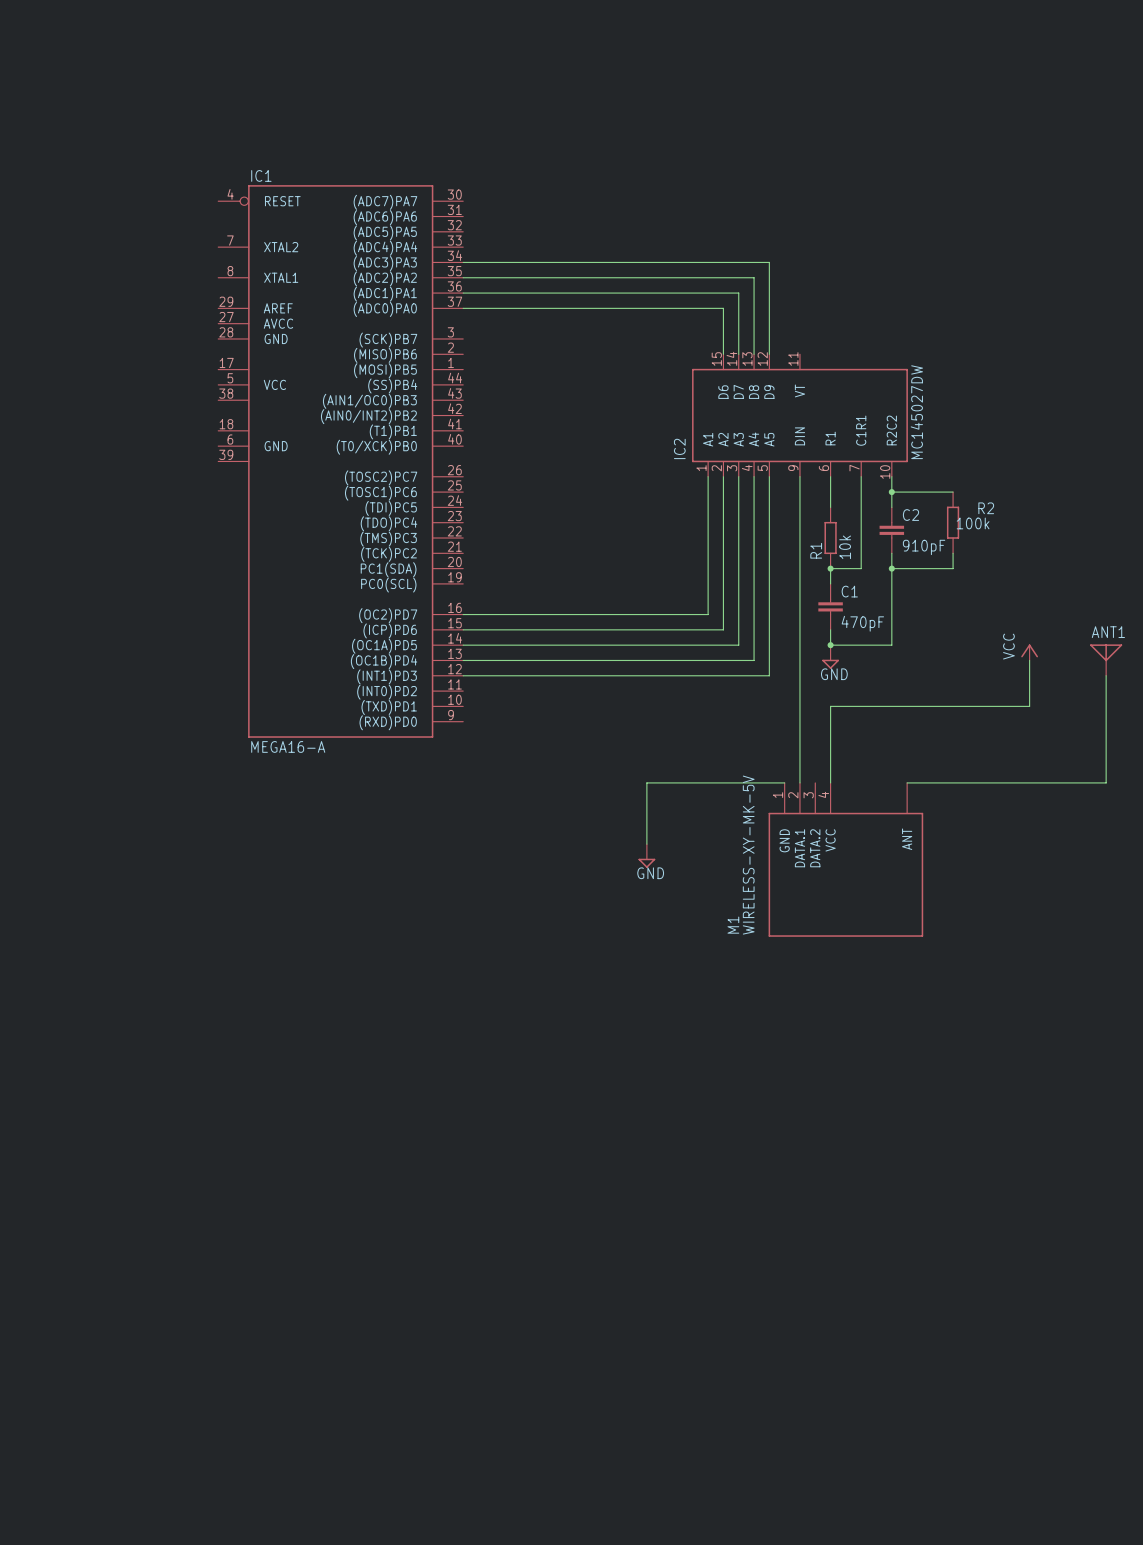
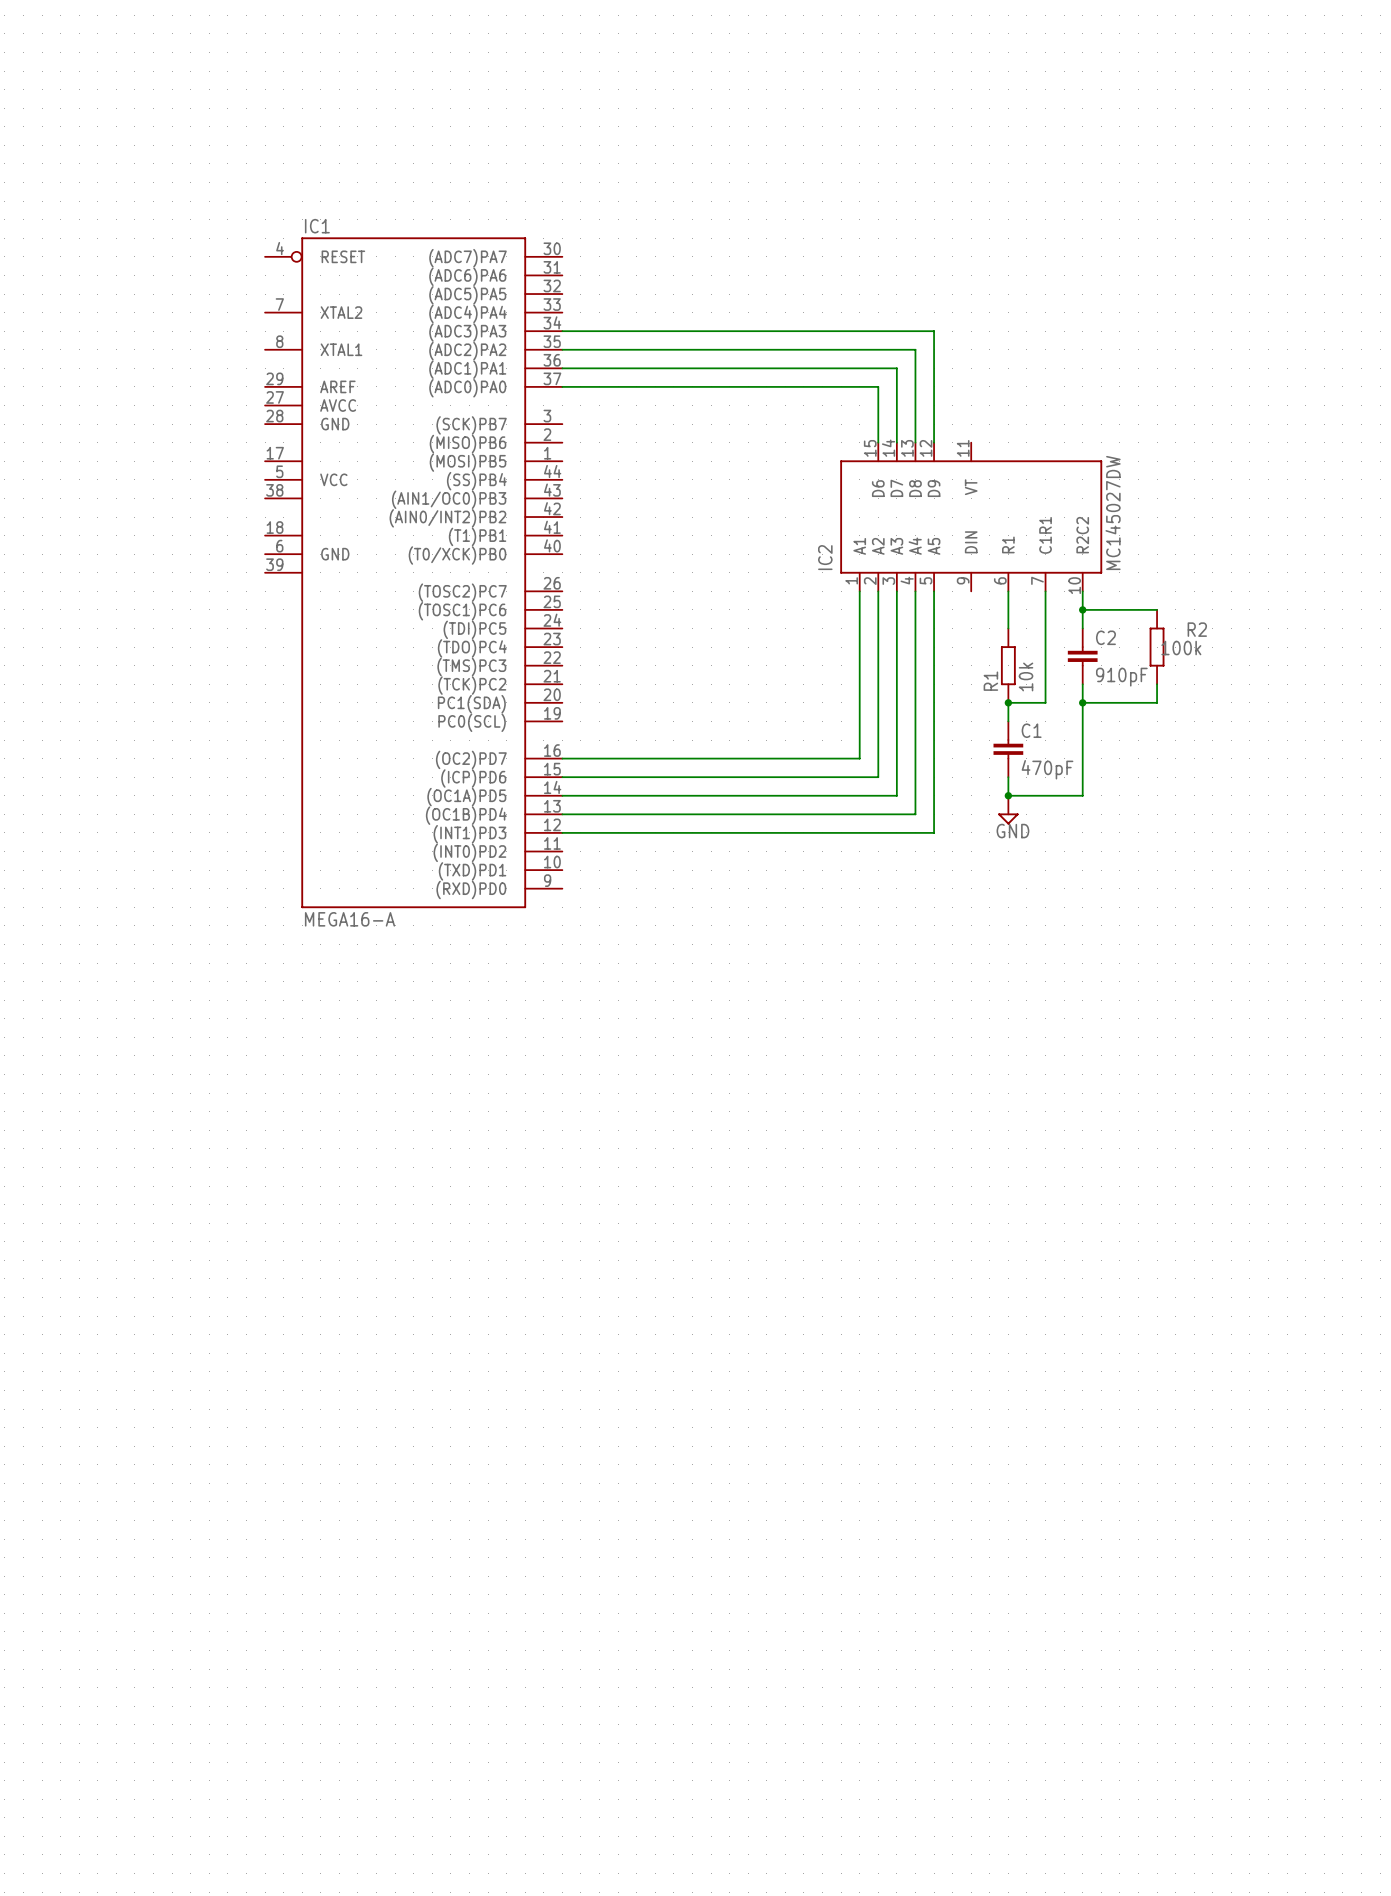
wire: (799, 476) (799, 782) -> none
power symbol: VCC (1029, 652) -> none
wire: (1029, 660) (1029, 706) (830, 706) (830, 782) -> none
ANT1: (1106, 660) -> none
wire: (1106, 675) (1106, 782) (907, 782) -> none
wire: (784, 782) (646, 782) (646, 844) -> none
power symbol: GND (646, 856) -> none
M1: WIRELESS-XY-MK-5V (845, 859) -> none

